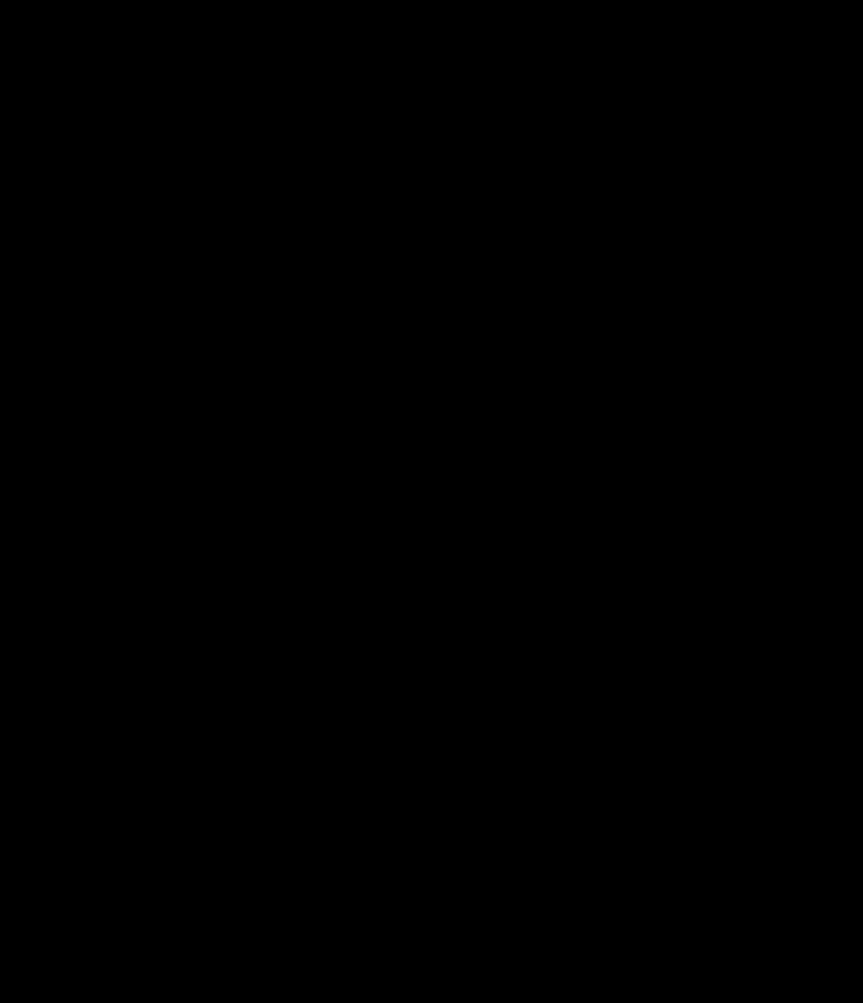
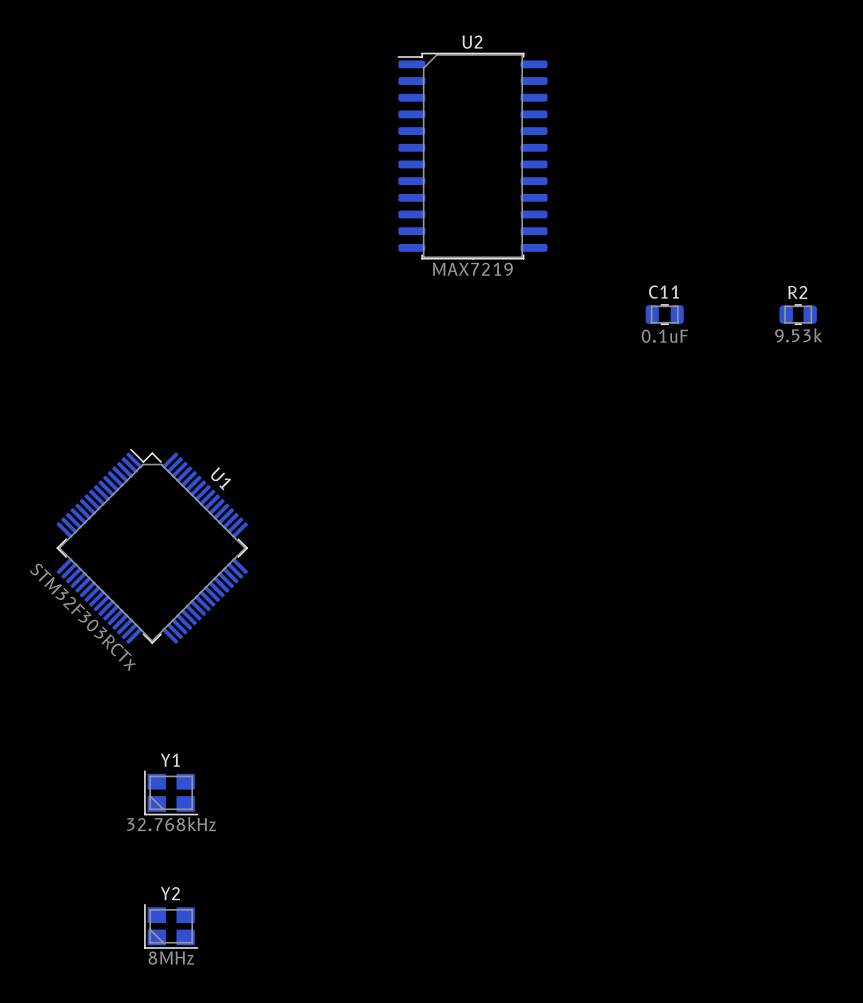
U2: none -> MAX7219 (472, 156)
C11: none -> 0.1uF (664, 314)
R2: none -> 9.53k (798, 314)
U1: none -> STM32F303RCTx (152, 546)
Y1: none -> 32.768kHz (171, 792)
Y2: none -> 8MHz (171, 926)

